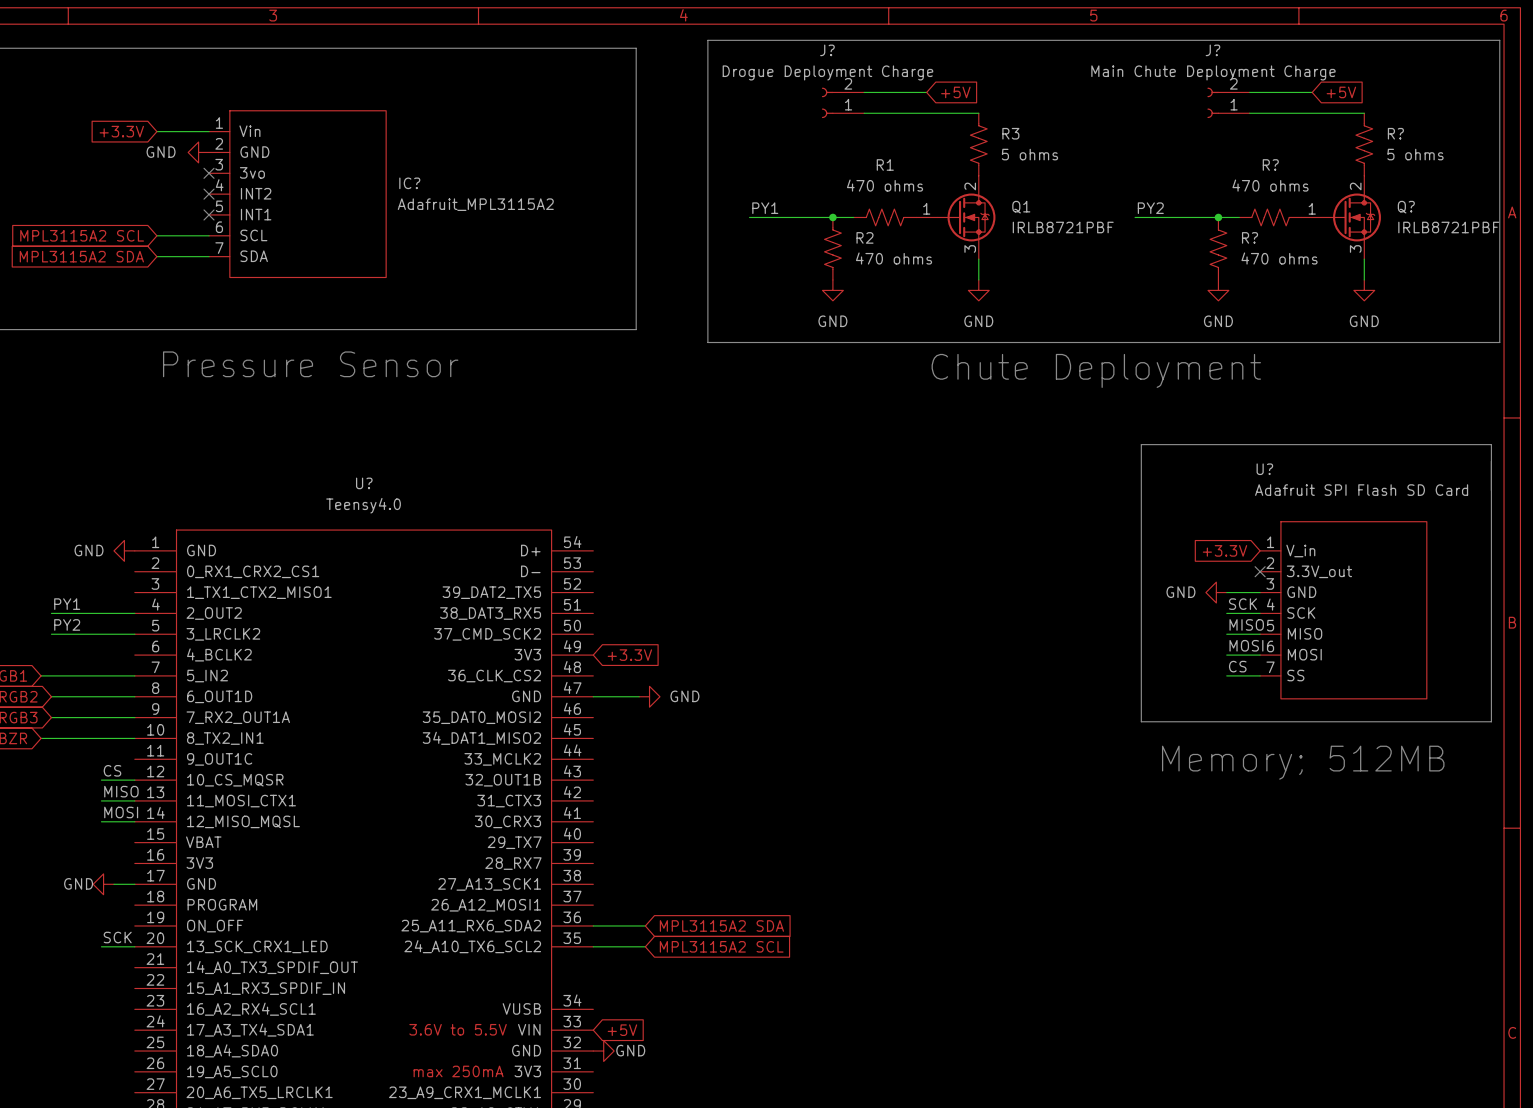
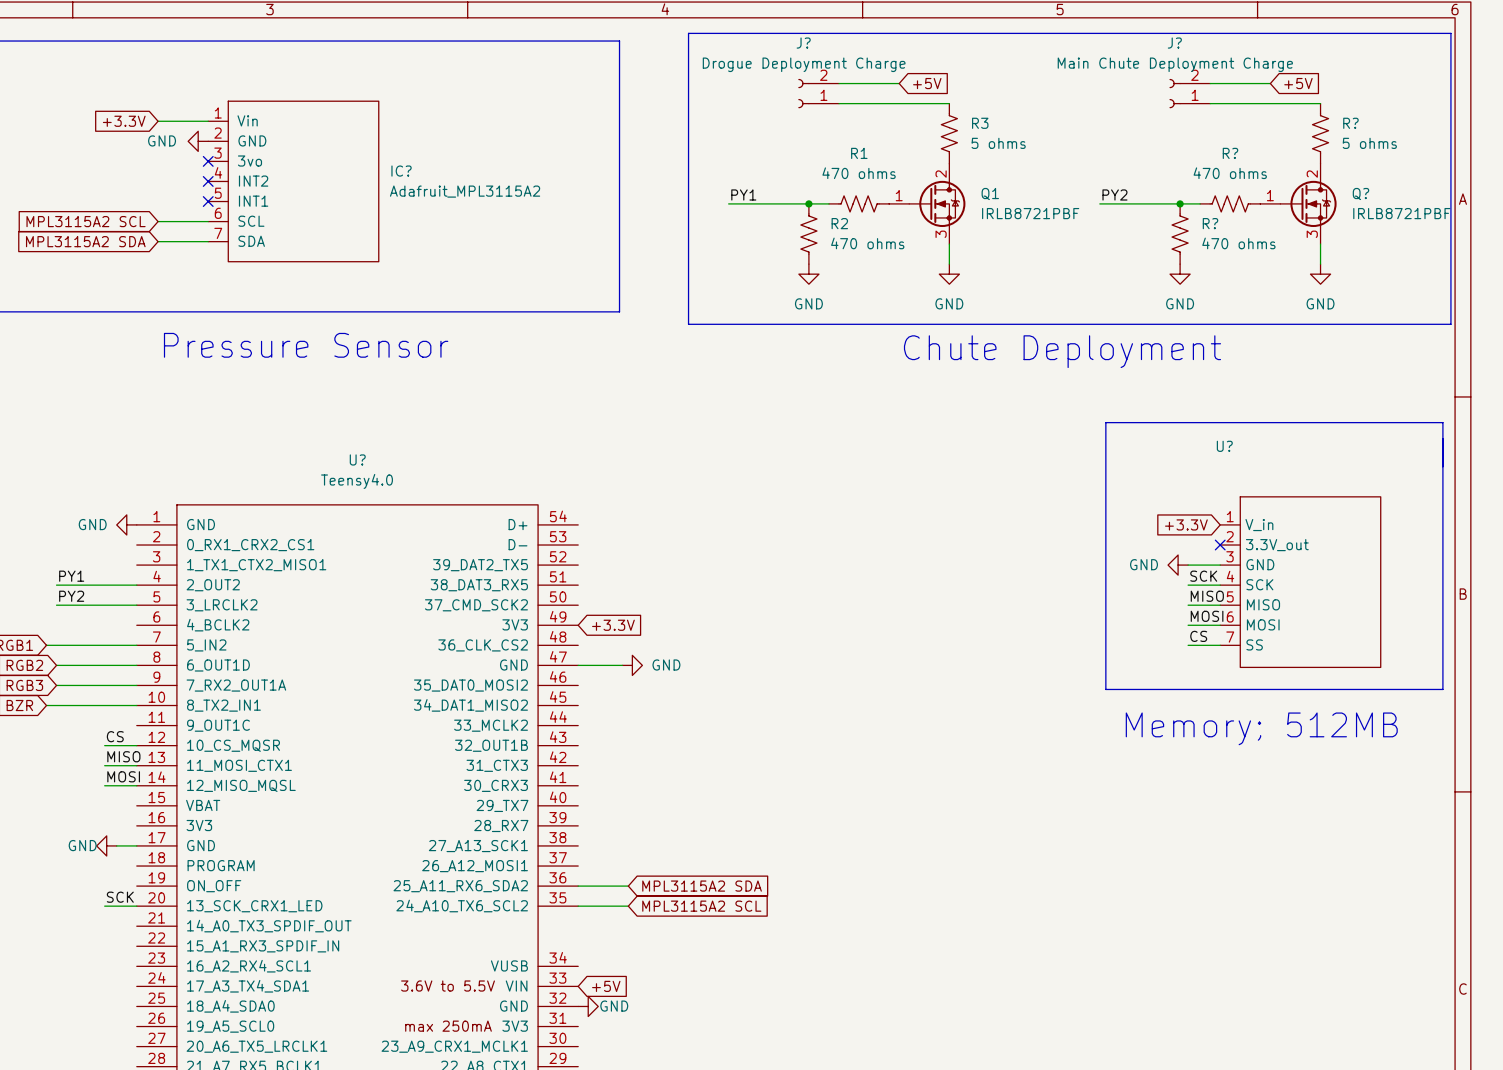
U? value: Adafruit SPI Flash SD Card (1361, 490) -> none

